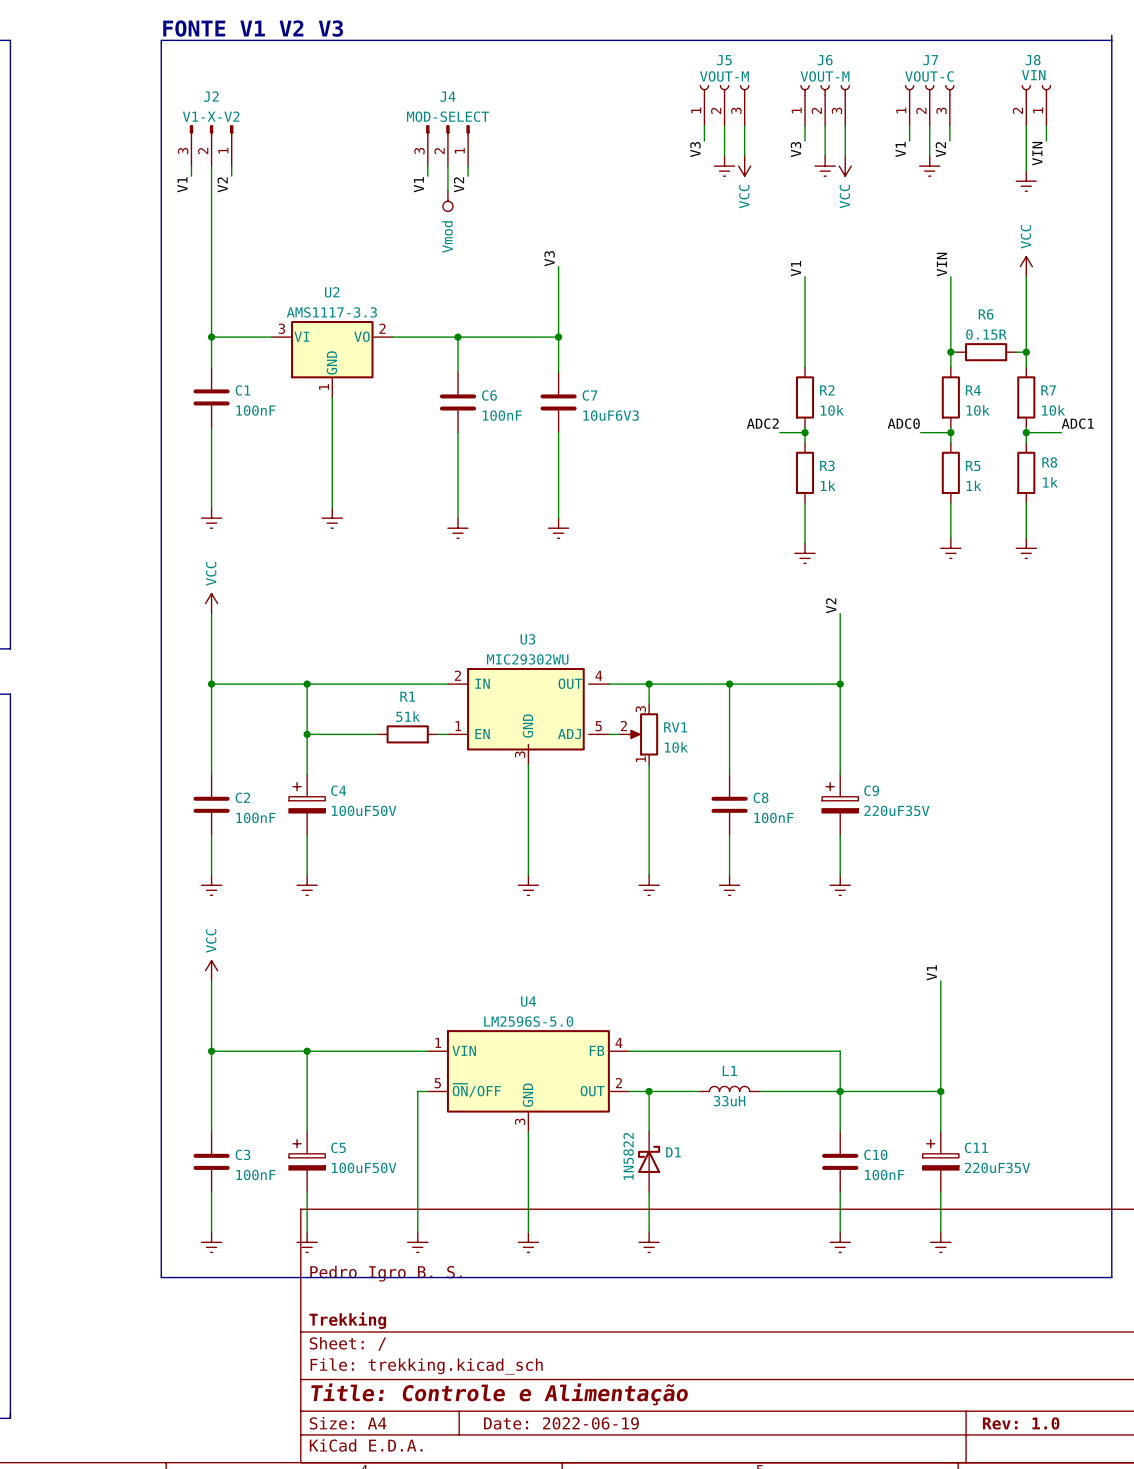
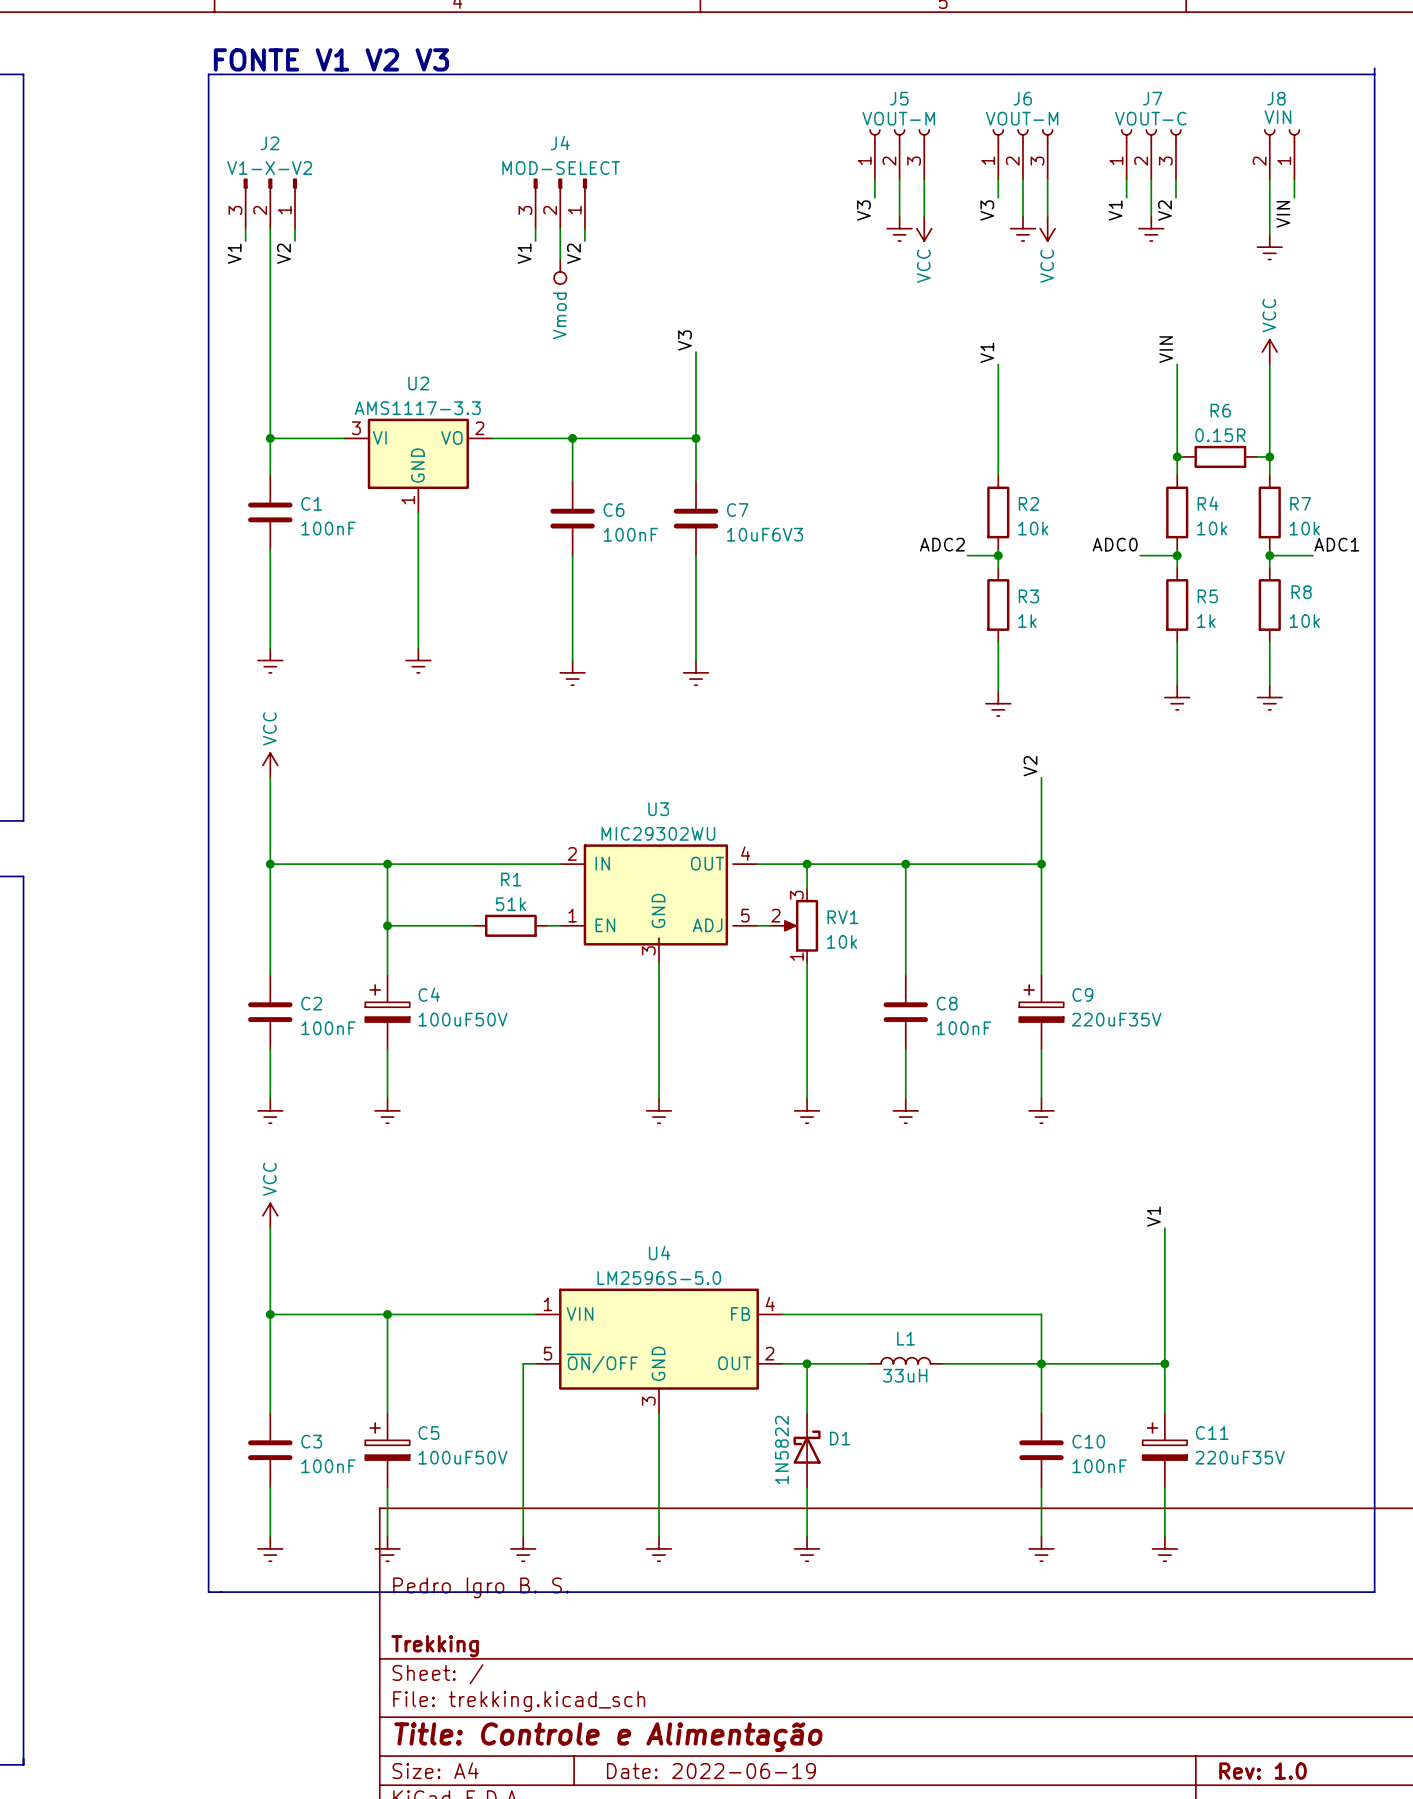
R8 value: 1k (1050, 482) -> 10k (1304, 621)

